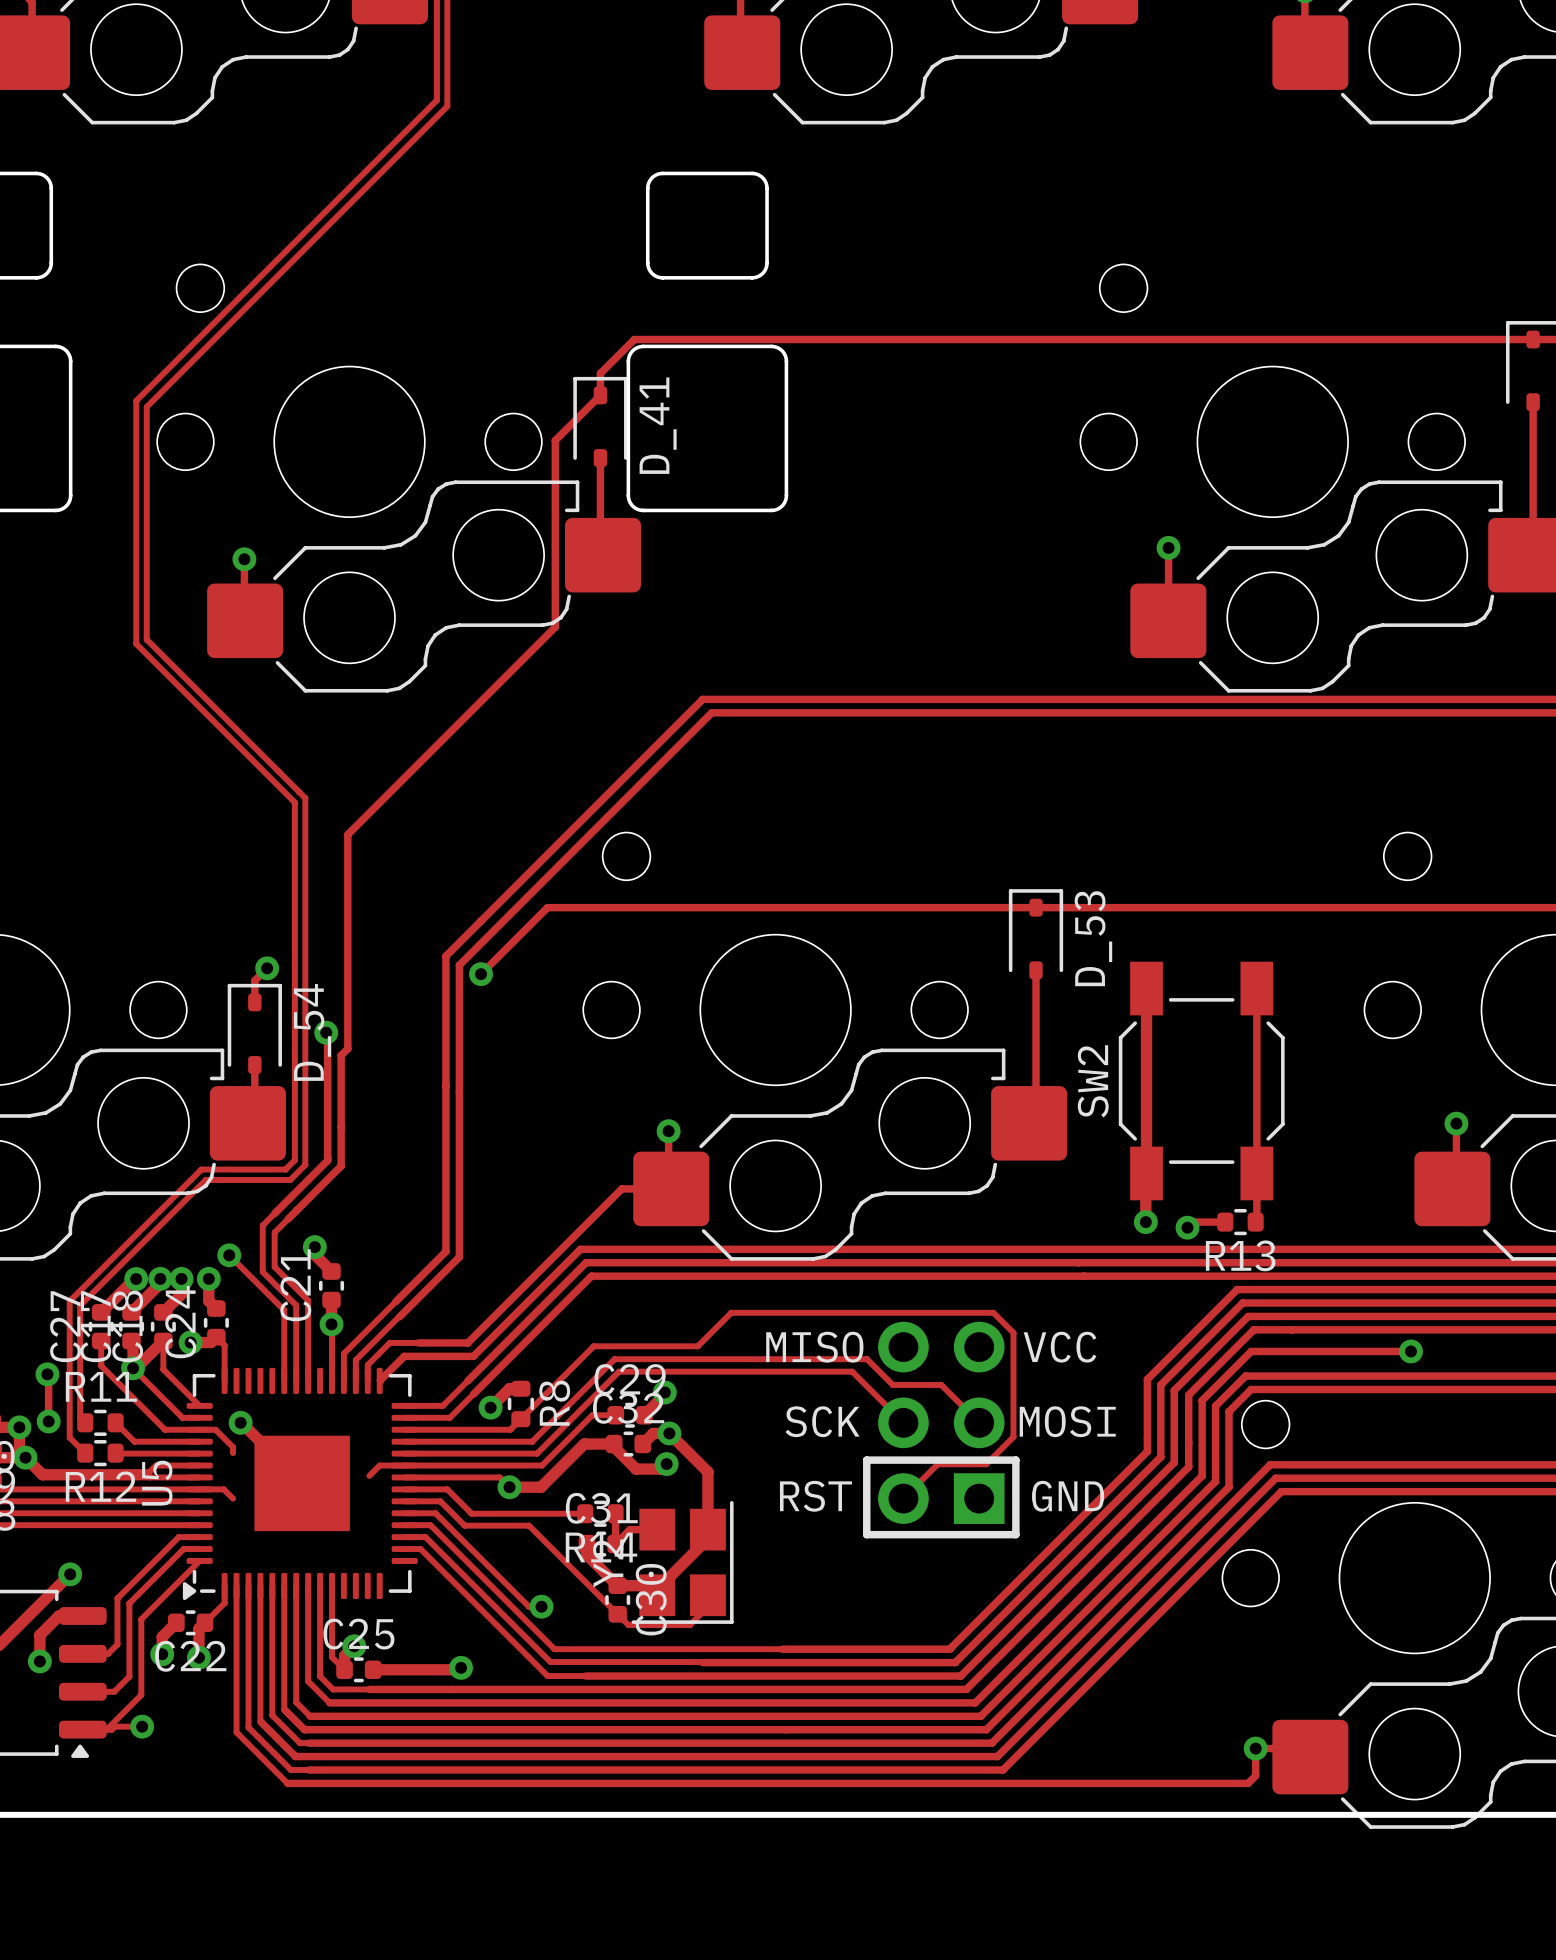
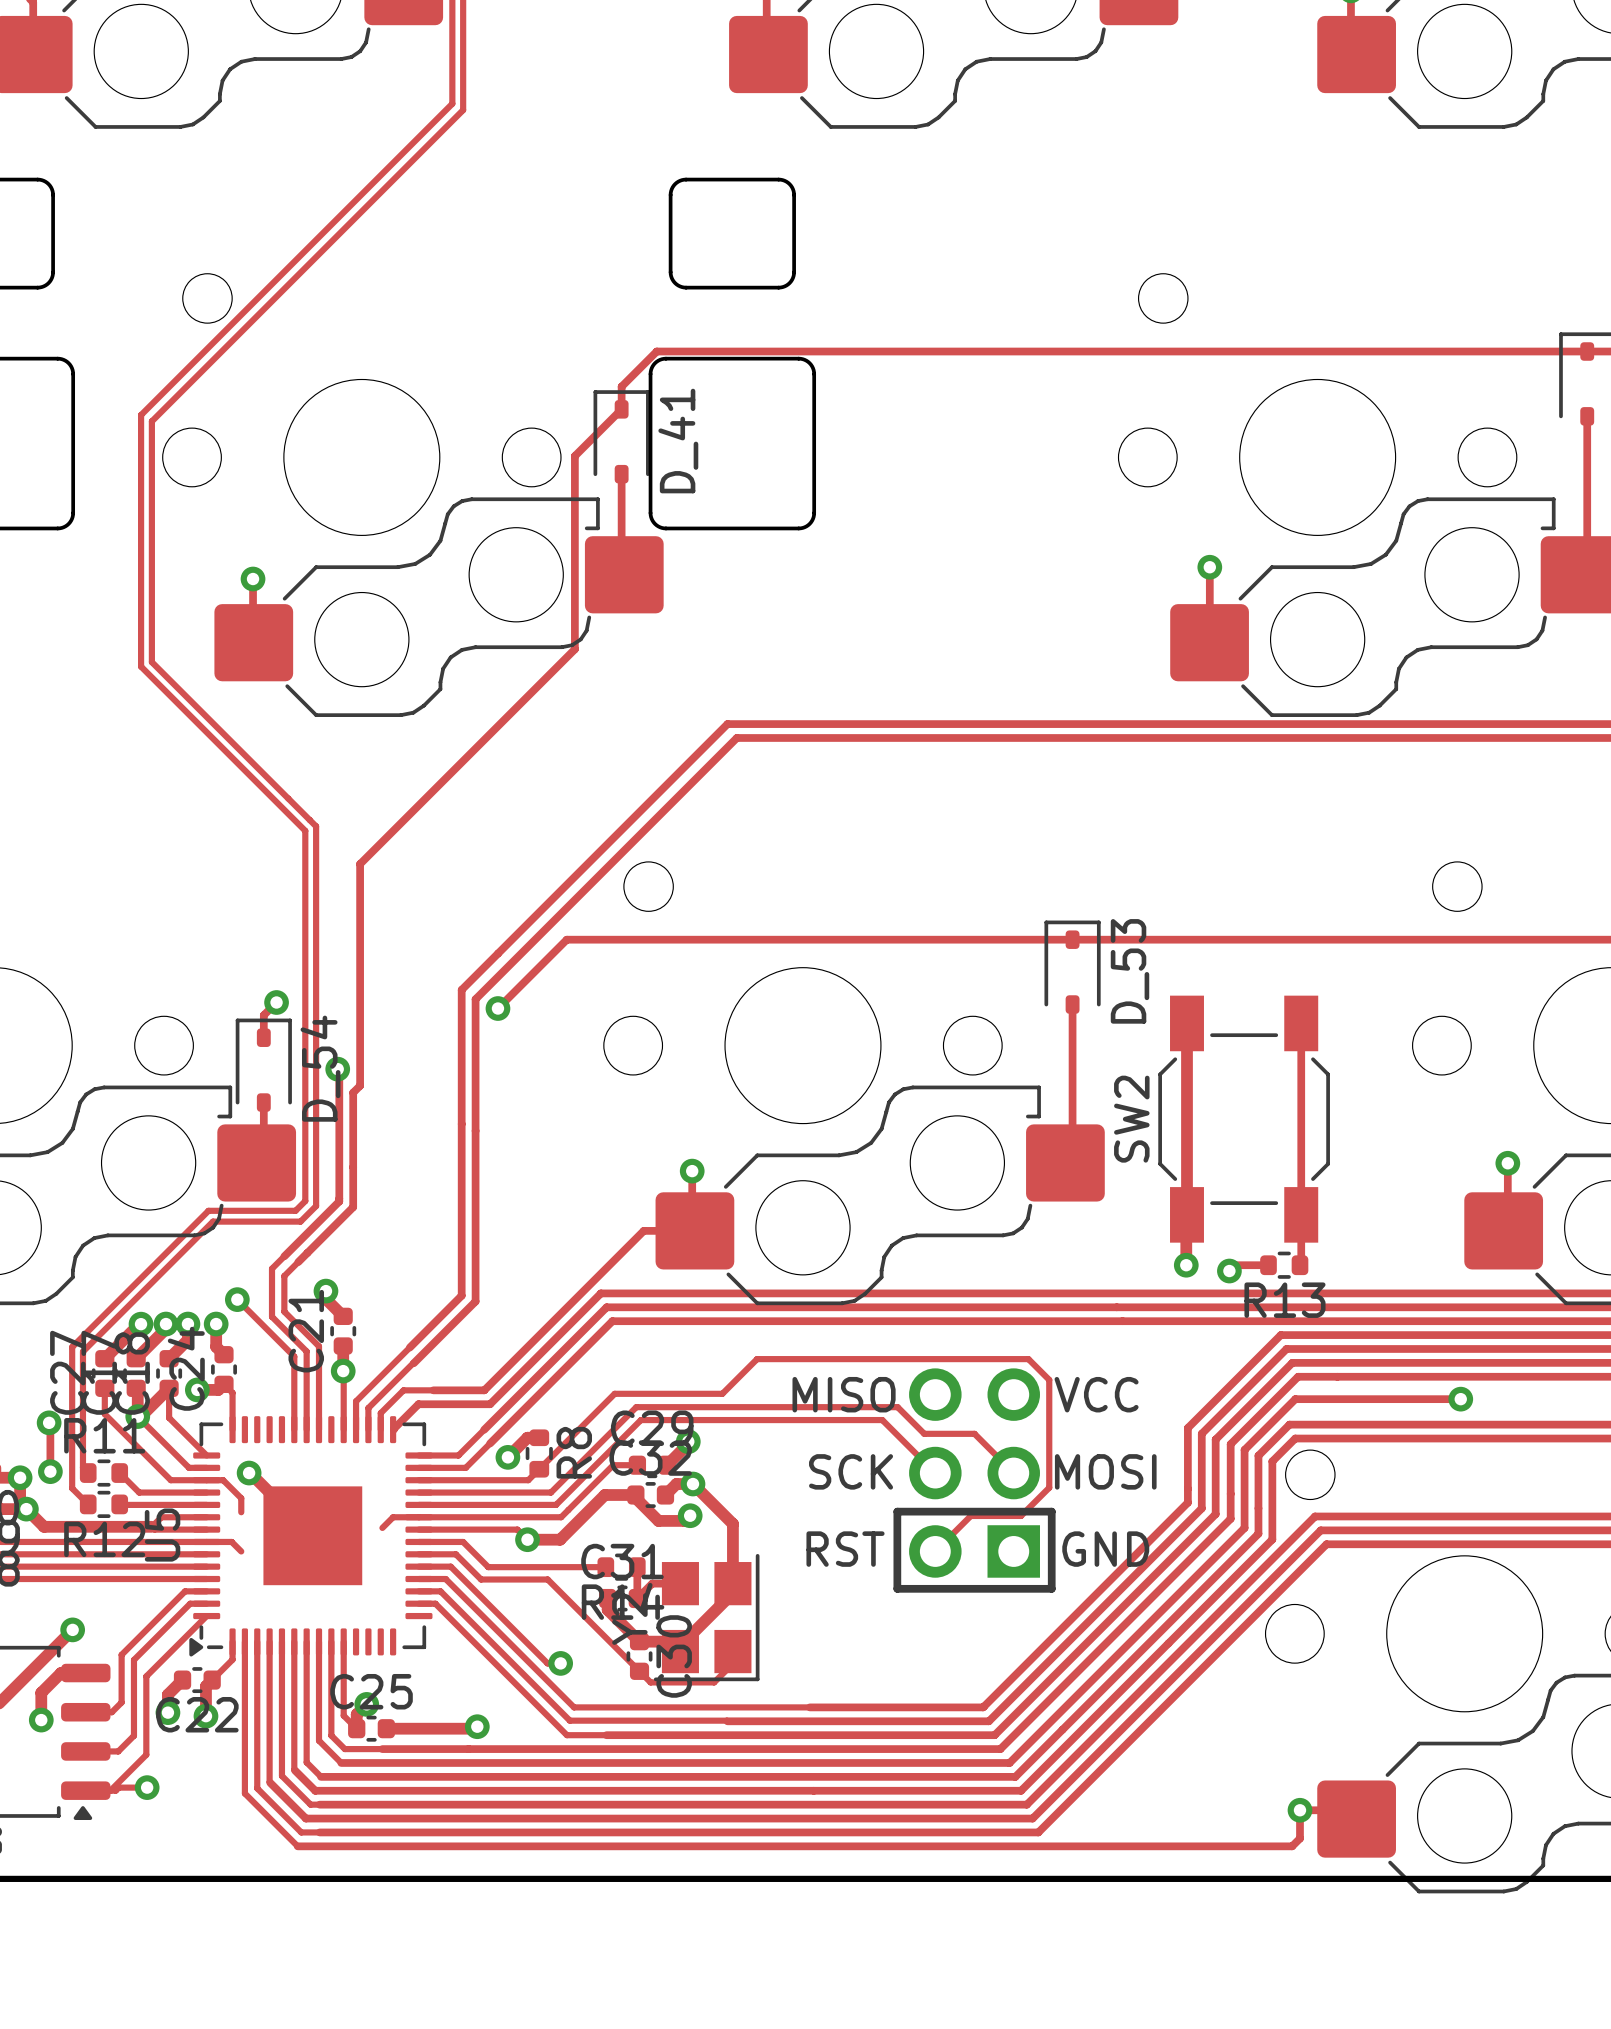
track: none -> (241, 1504) (241, 1512)

